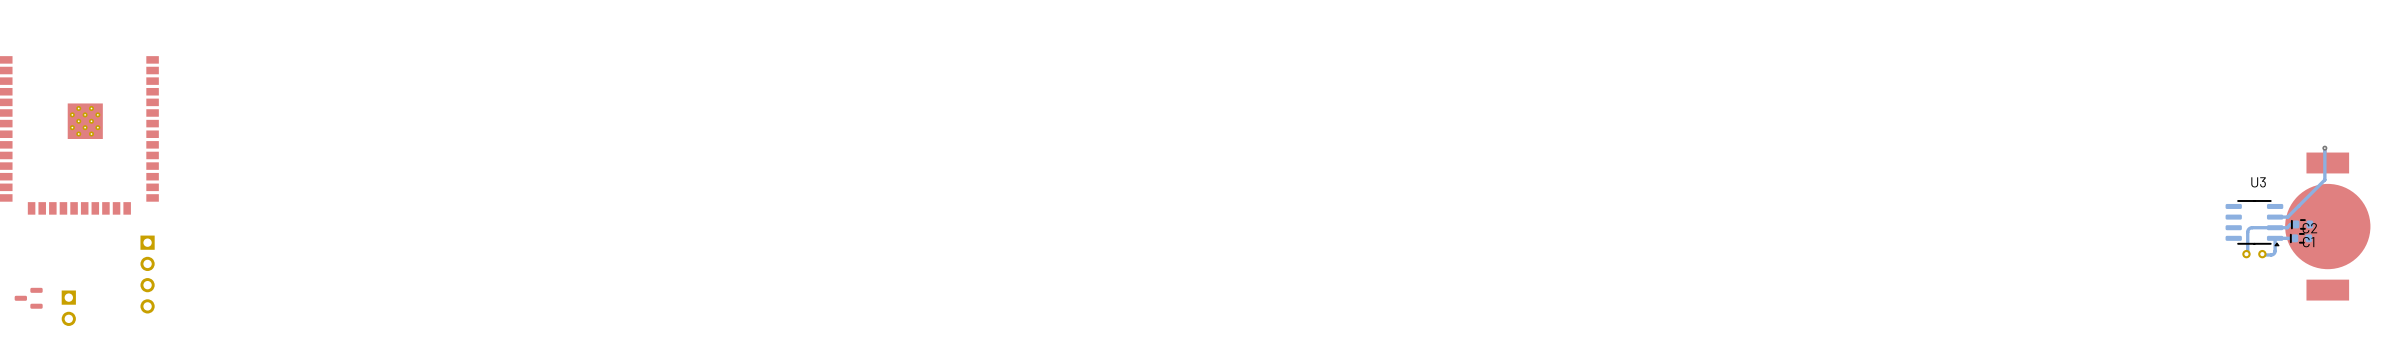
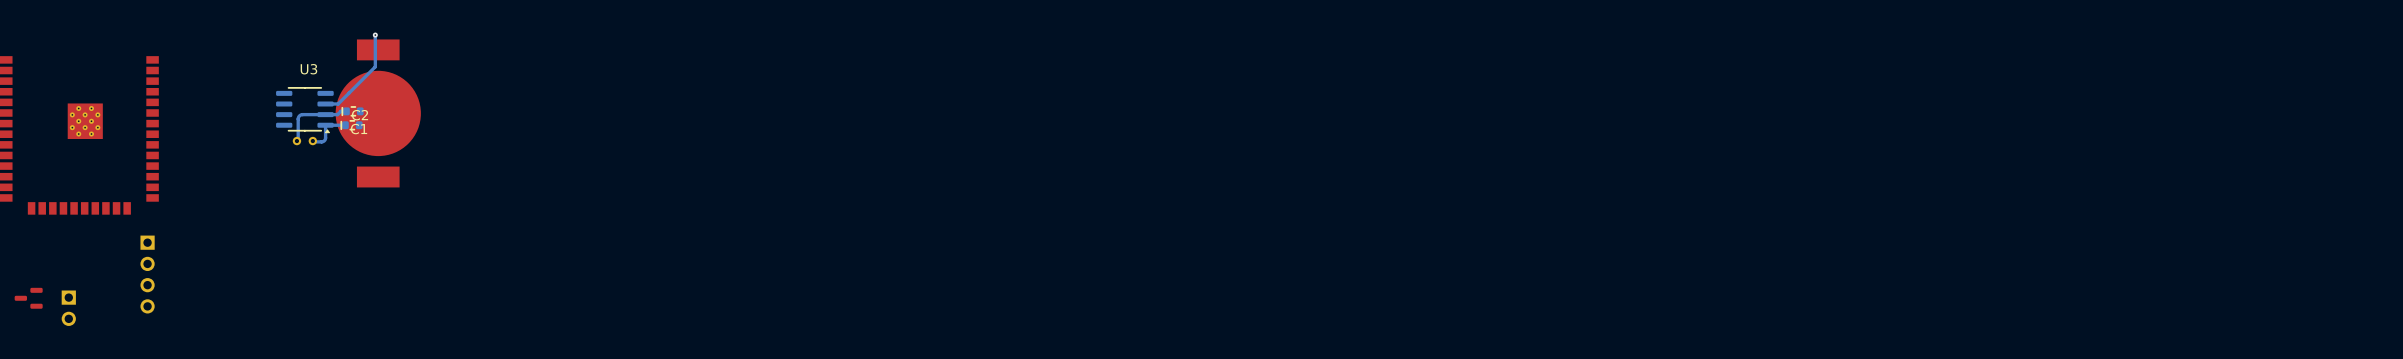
bottom track: none -> (375, 35) (375, 66) (338, 104) (325, 104)
via: none -> (375, 35)
bottom track: none -> (346, 111) (340, 111) (337, 114) (300, 115) (298, 118) (296, 141)
part: none -> (378, 113)
bottom track: none -> (345, 125) (325, 125) (324, 140) (312, 141)
part: none -> (304, 141)
bottom track: (2324, 148) (2324, 179) (2287, 217) (2275, 217) -> none
via: (2324, 148) -> none
U3 position: (2254, 223) -> (304, 110)
bottom track: (2296, 224) (2290, 224) (2287, 227) (2249, 228) (2247, 231) (2246, 254) -> none
C2 position: (2302, 224) -> (352, 111)
part: (2327, 226) -> none
bottom track: (2294, 238) (2275, 238) (2274, 253) (2262, 254) -> none
C1 position: (2301, 238) -> (351, 125)
part: (2254, 254) -> none

